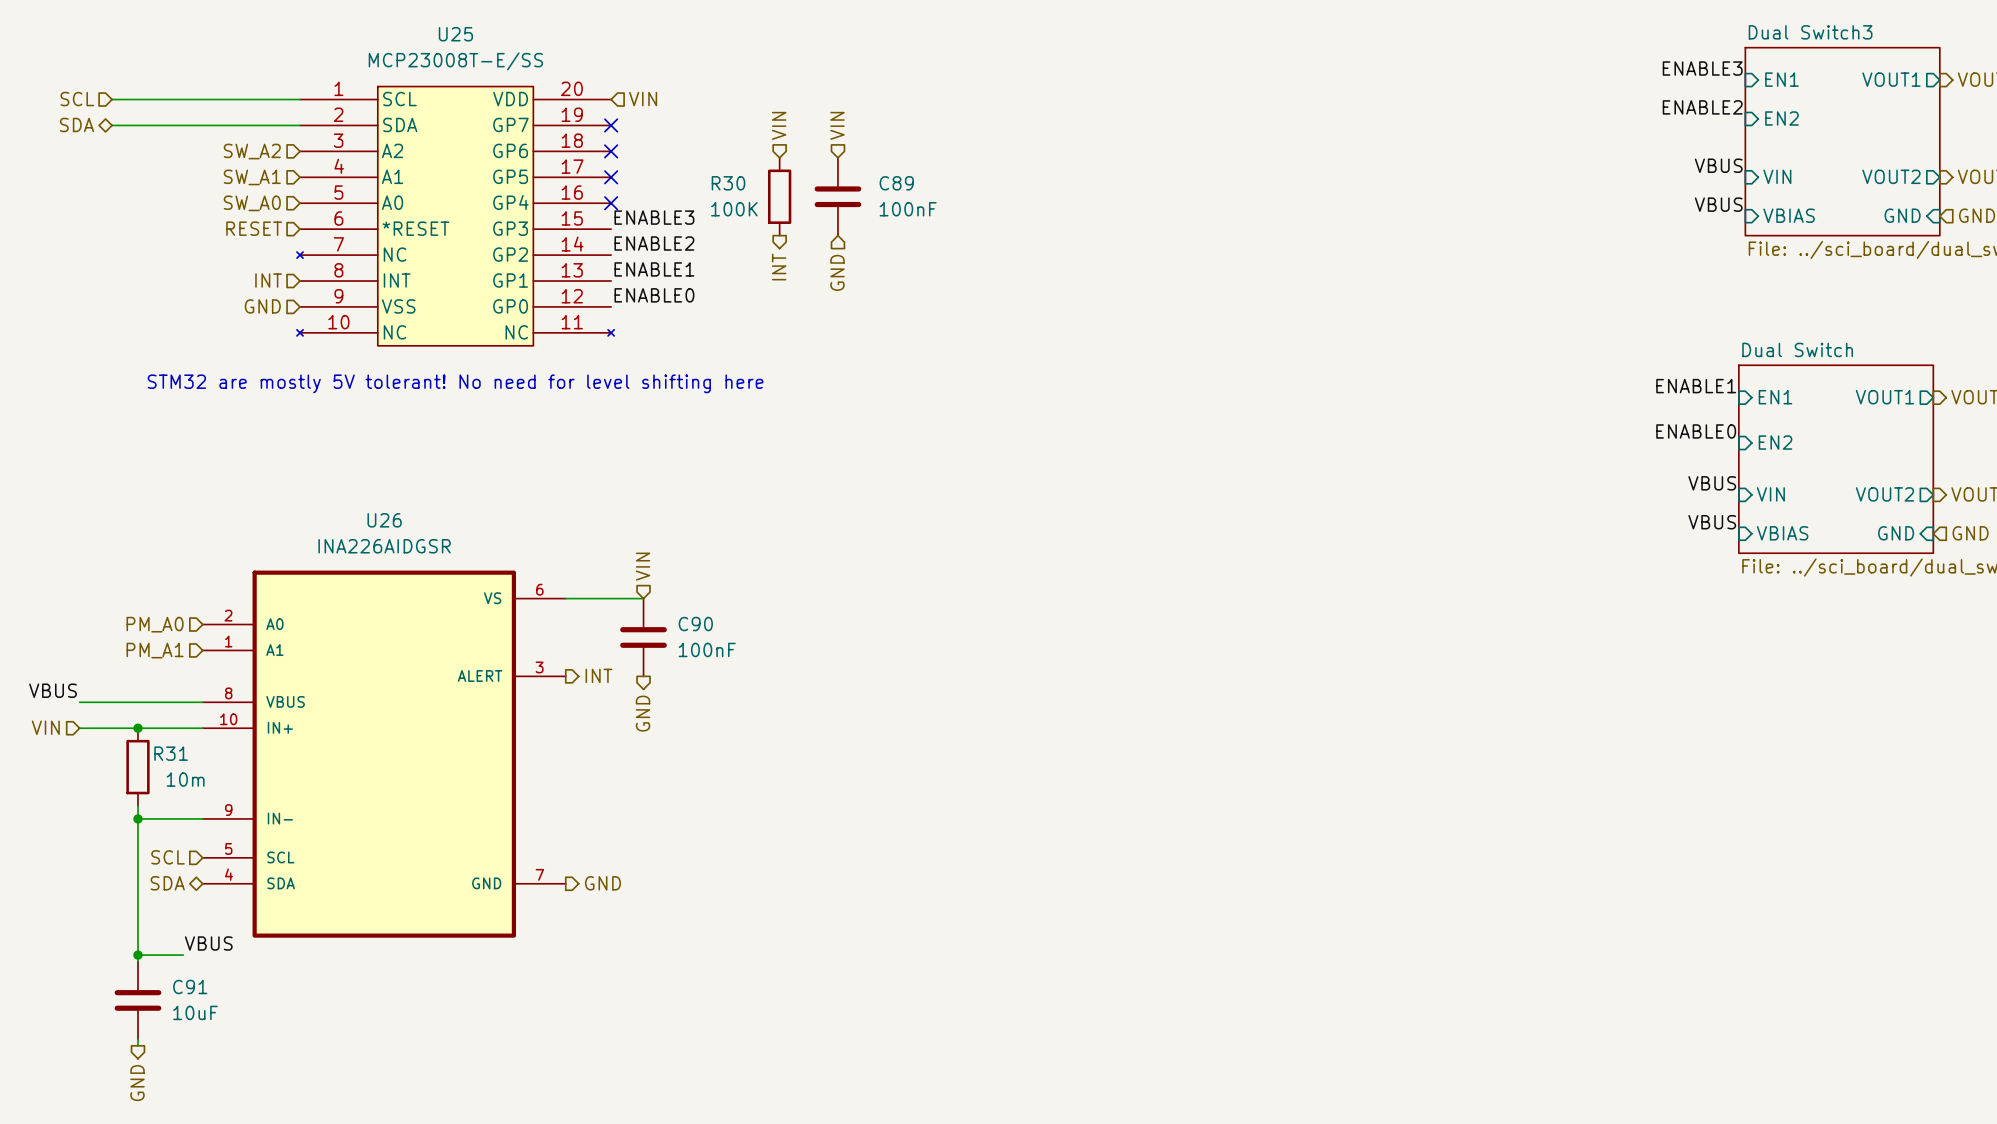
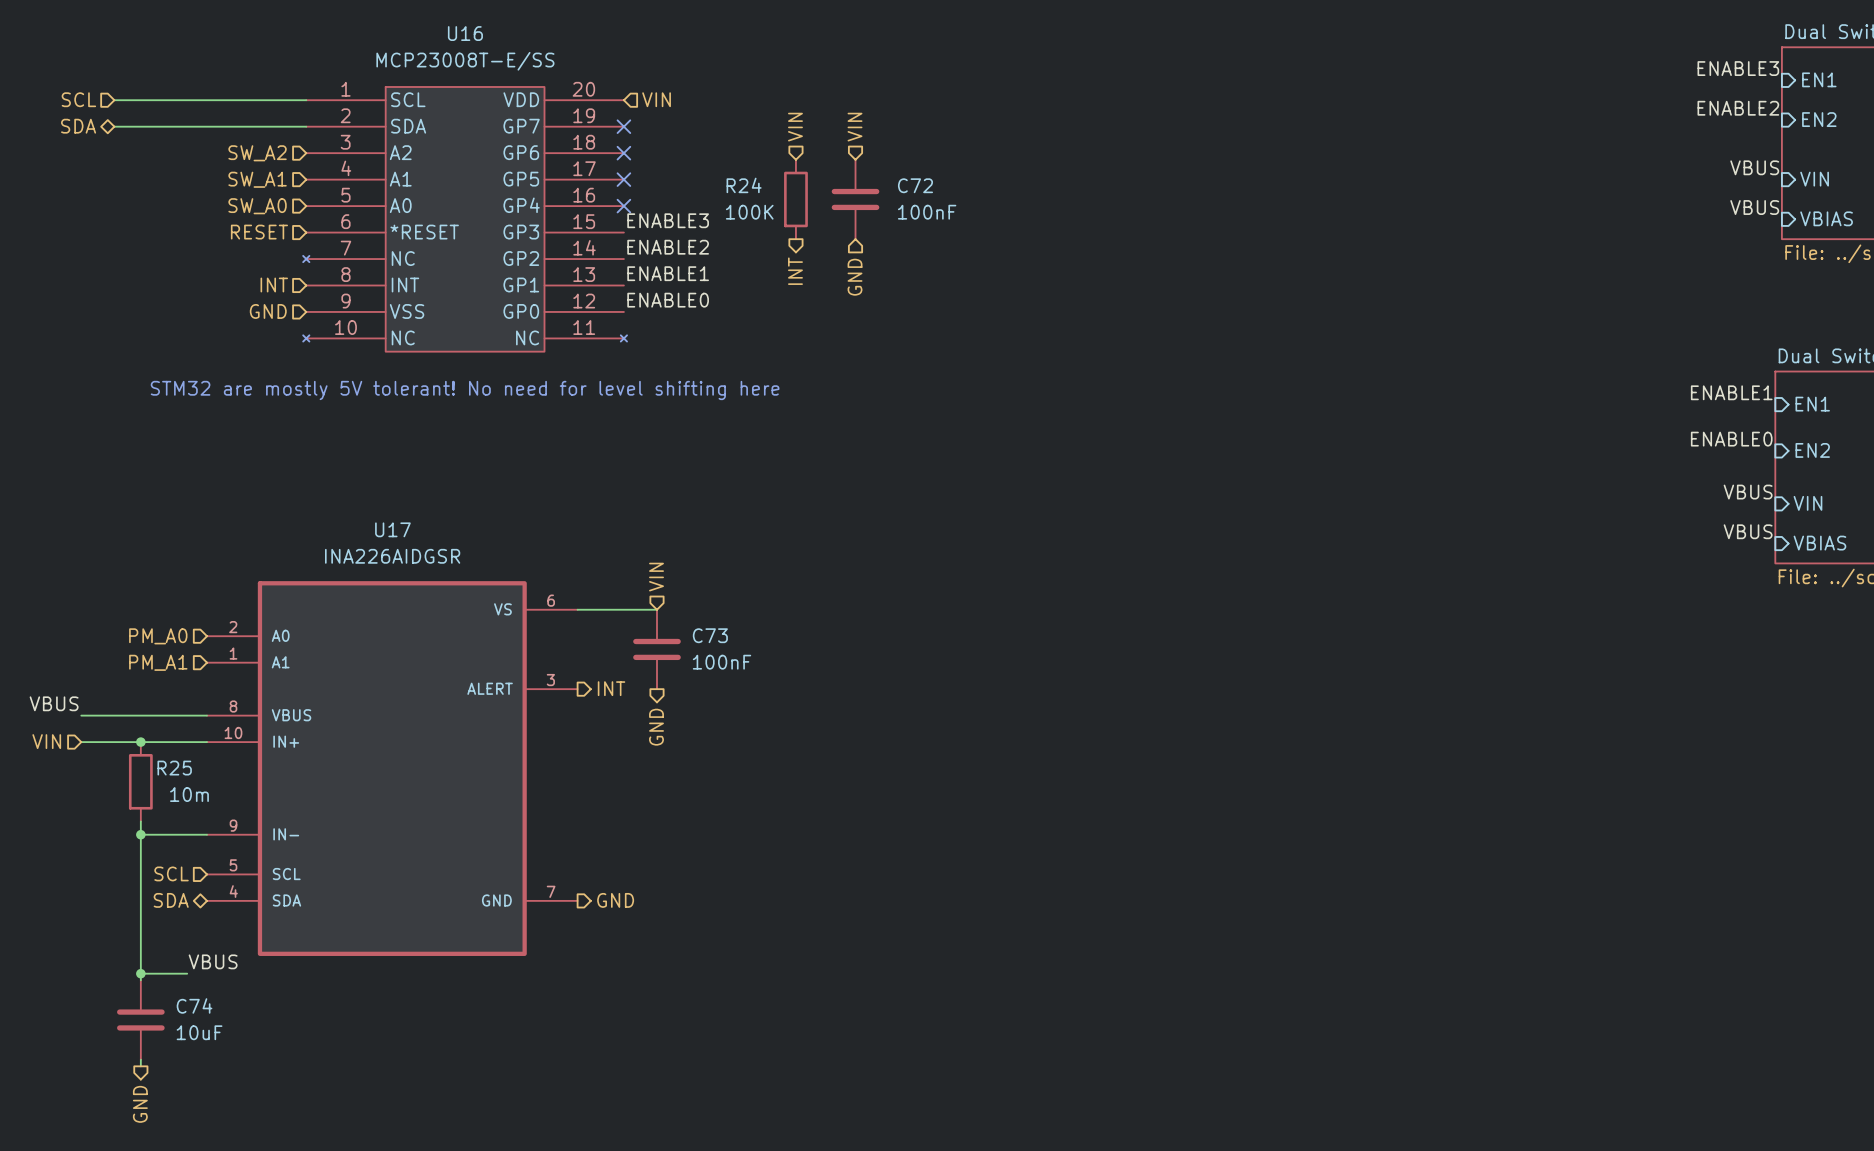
U25 name: U25 (455, 34) -> U16 (465, 33)
R30 name: R30 (728, 183) -> R24 (744, 185)
C89 name: C89 (896, 183) -> C72 (915, 185)
U26 name: U26 (384, 520) -> U17 (392, 529)
C90 name: C90 (695, 624) -> C73 (710, 635)
R31 name: R31 (171, 753) -> R25 (174, 768)
C91 name: C91 (190, 986) -> C74 (194, 1005)

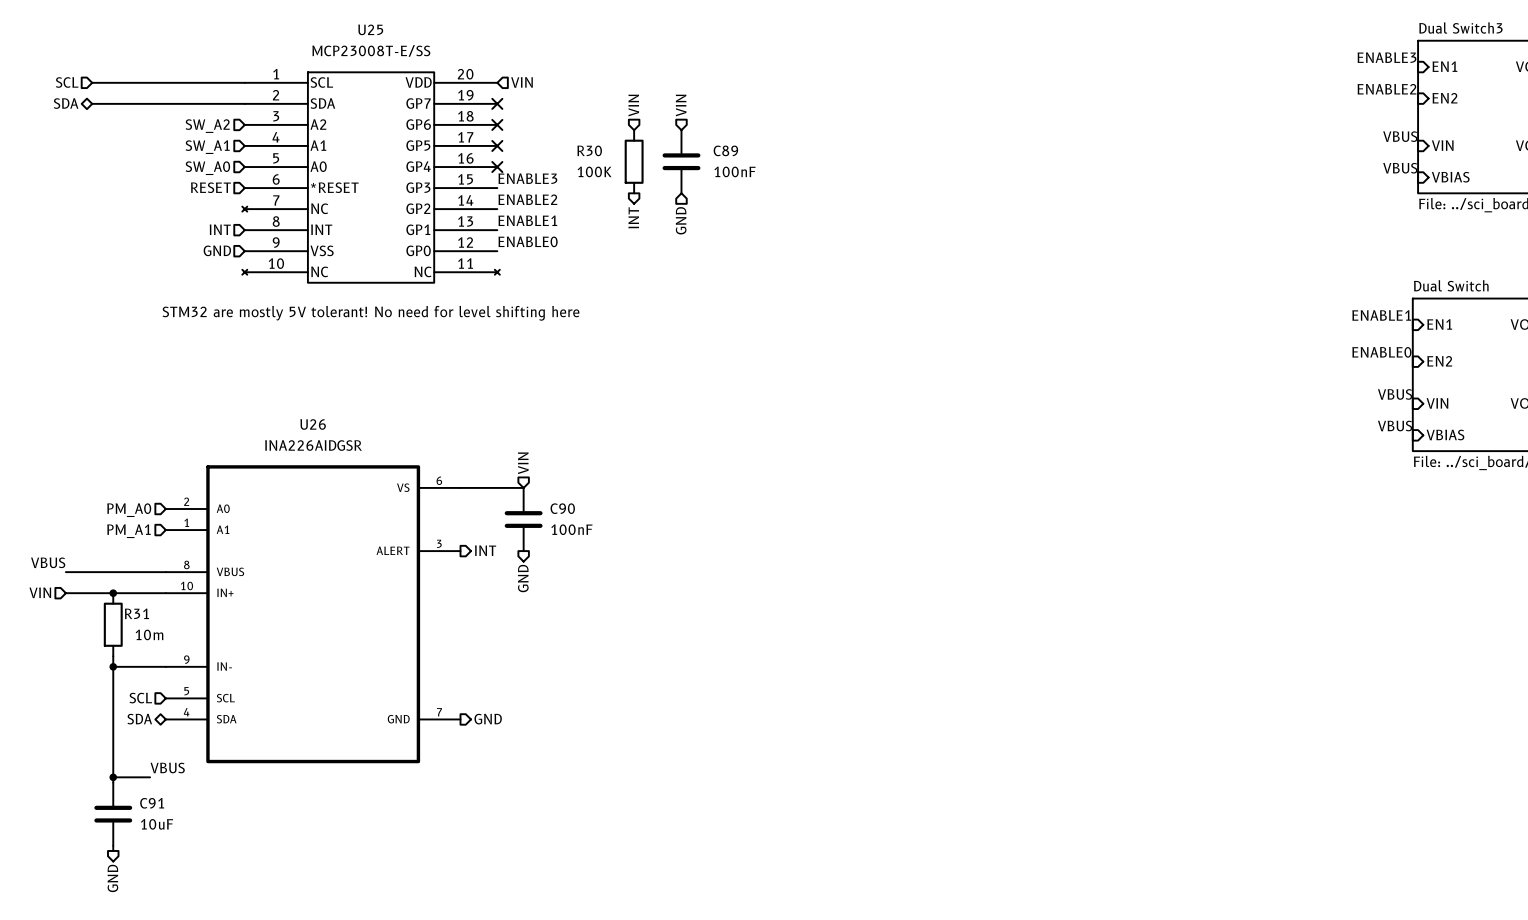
U16 name: U16 (465, 33) -> U25 (370, 29)
R24 name: R24 (744, 185) -> R30 (589, 150)
C72 name: C72 (915, 185) -> C89 (725, 150)
U17 name: U17 (392, 529) -> U26 (313, 424)
C73 name: C73 (710, 635) -> C90 (562, 508)
R25 name: R25 (174, 768) -> R31 (136, 613)
C74 name: C74 (194, 1005) -> C91 (152, 803)

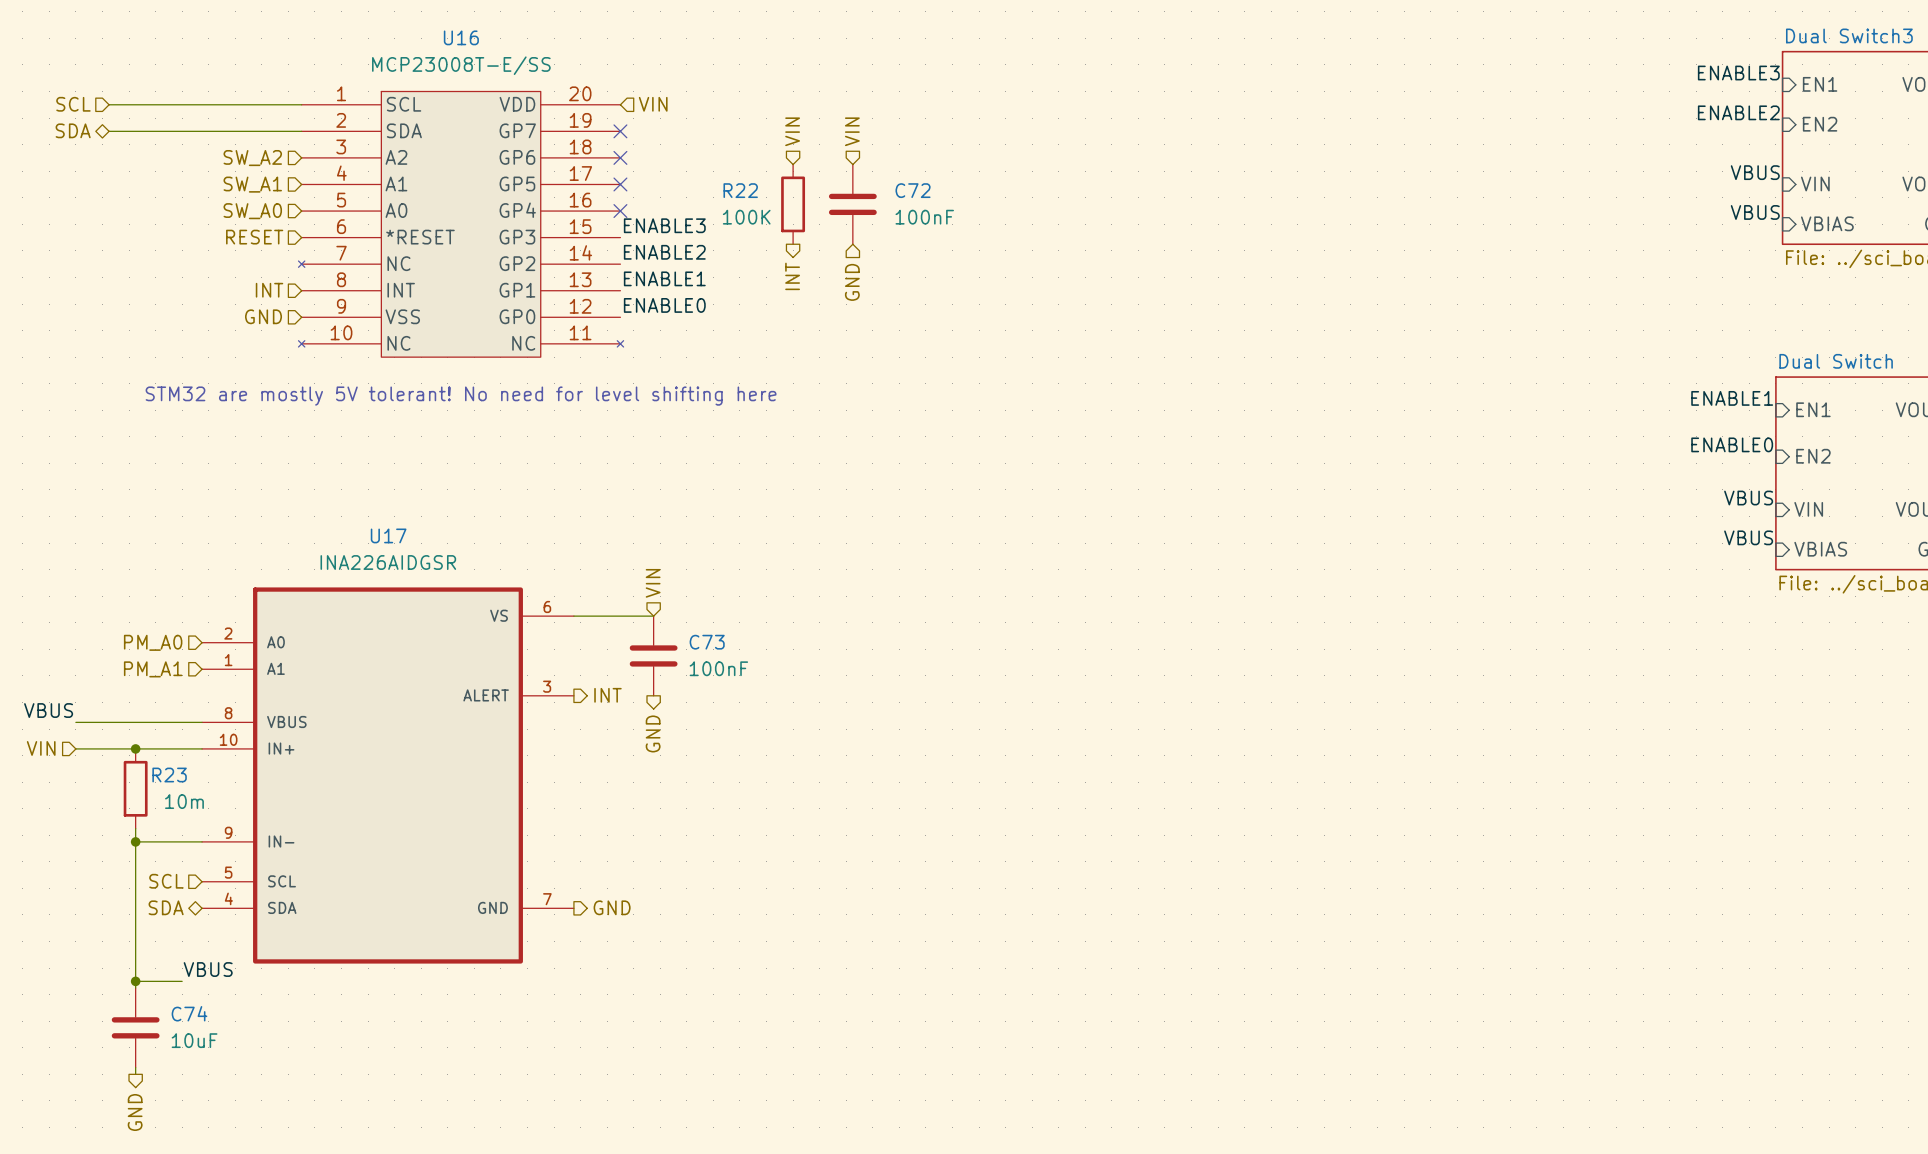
U25 name: U25 (370, 29) -> U16 (461, 37)
R30 name: R30 (589, 150) -> R22 (740, 190)
C89 name: C89 (725, 150) -> C72 (913, 190)
U26 name: U26 (313, 424) -> U17 (388, 535)
C90 name: C90 (562, 508) -> C73 (707, 642)
R31 name: R31 (136, 613) -> R23 (169, 775)
C91 name: C91 (152, 803) -> C74 (189, 1013)

